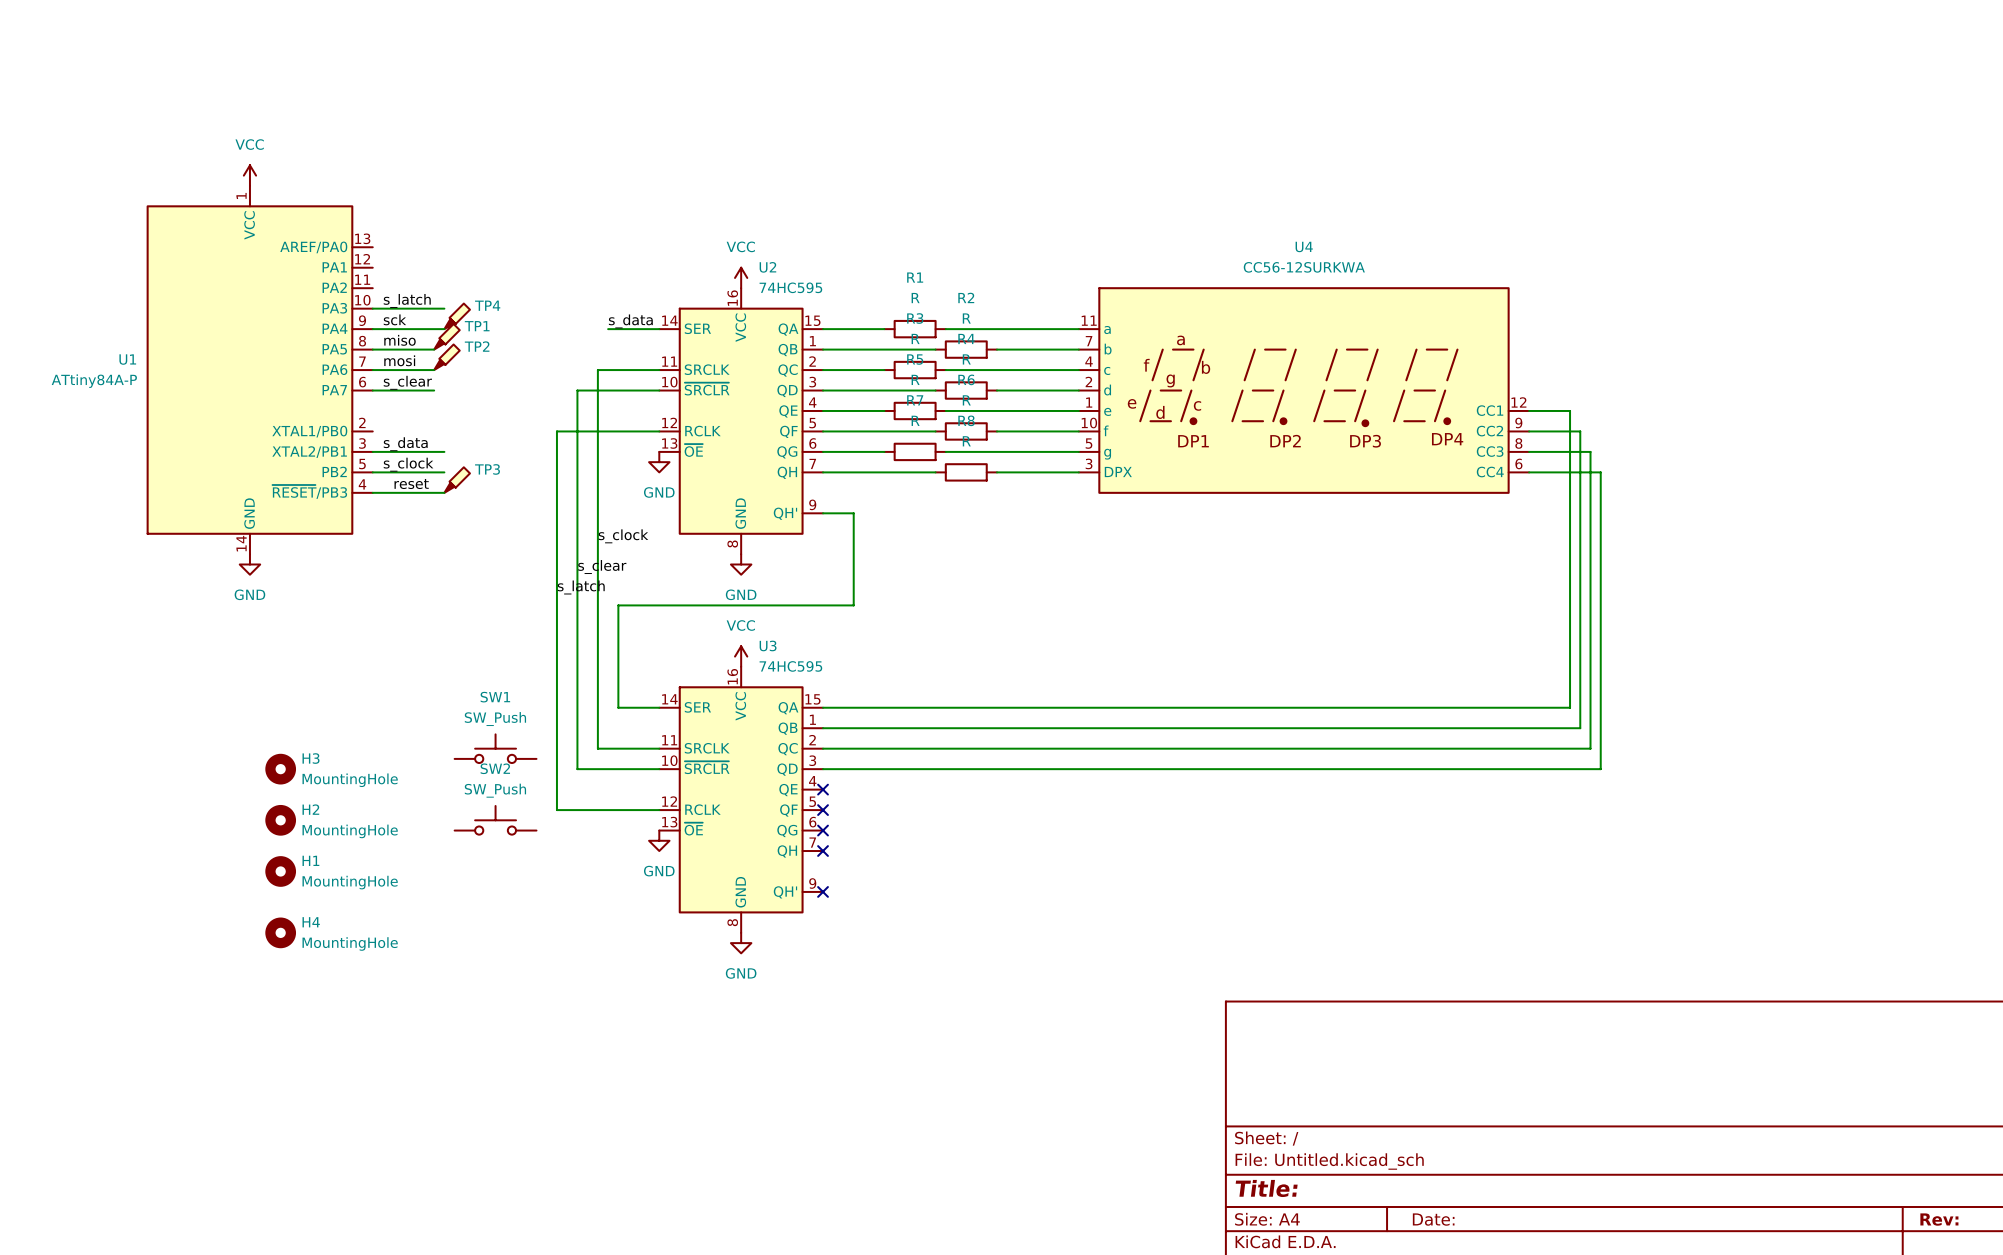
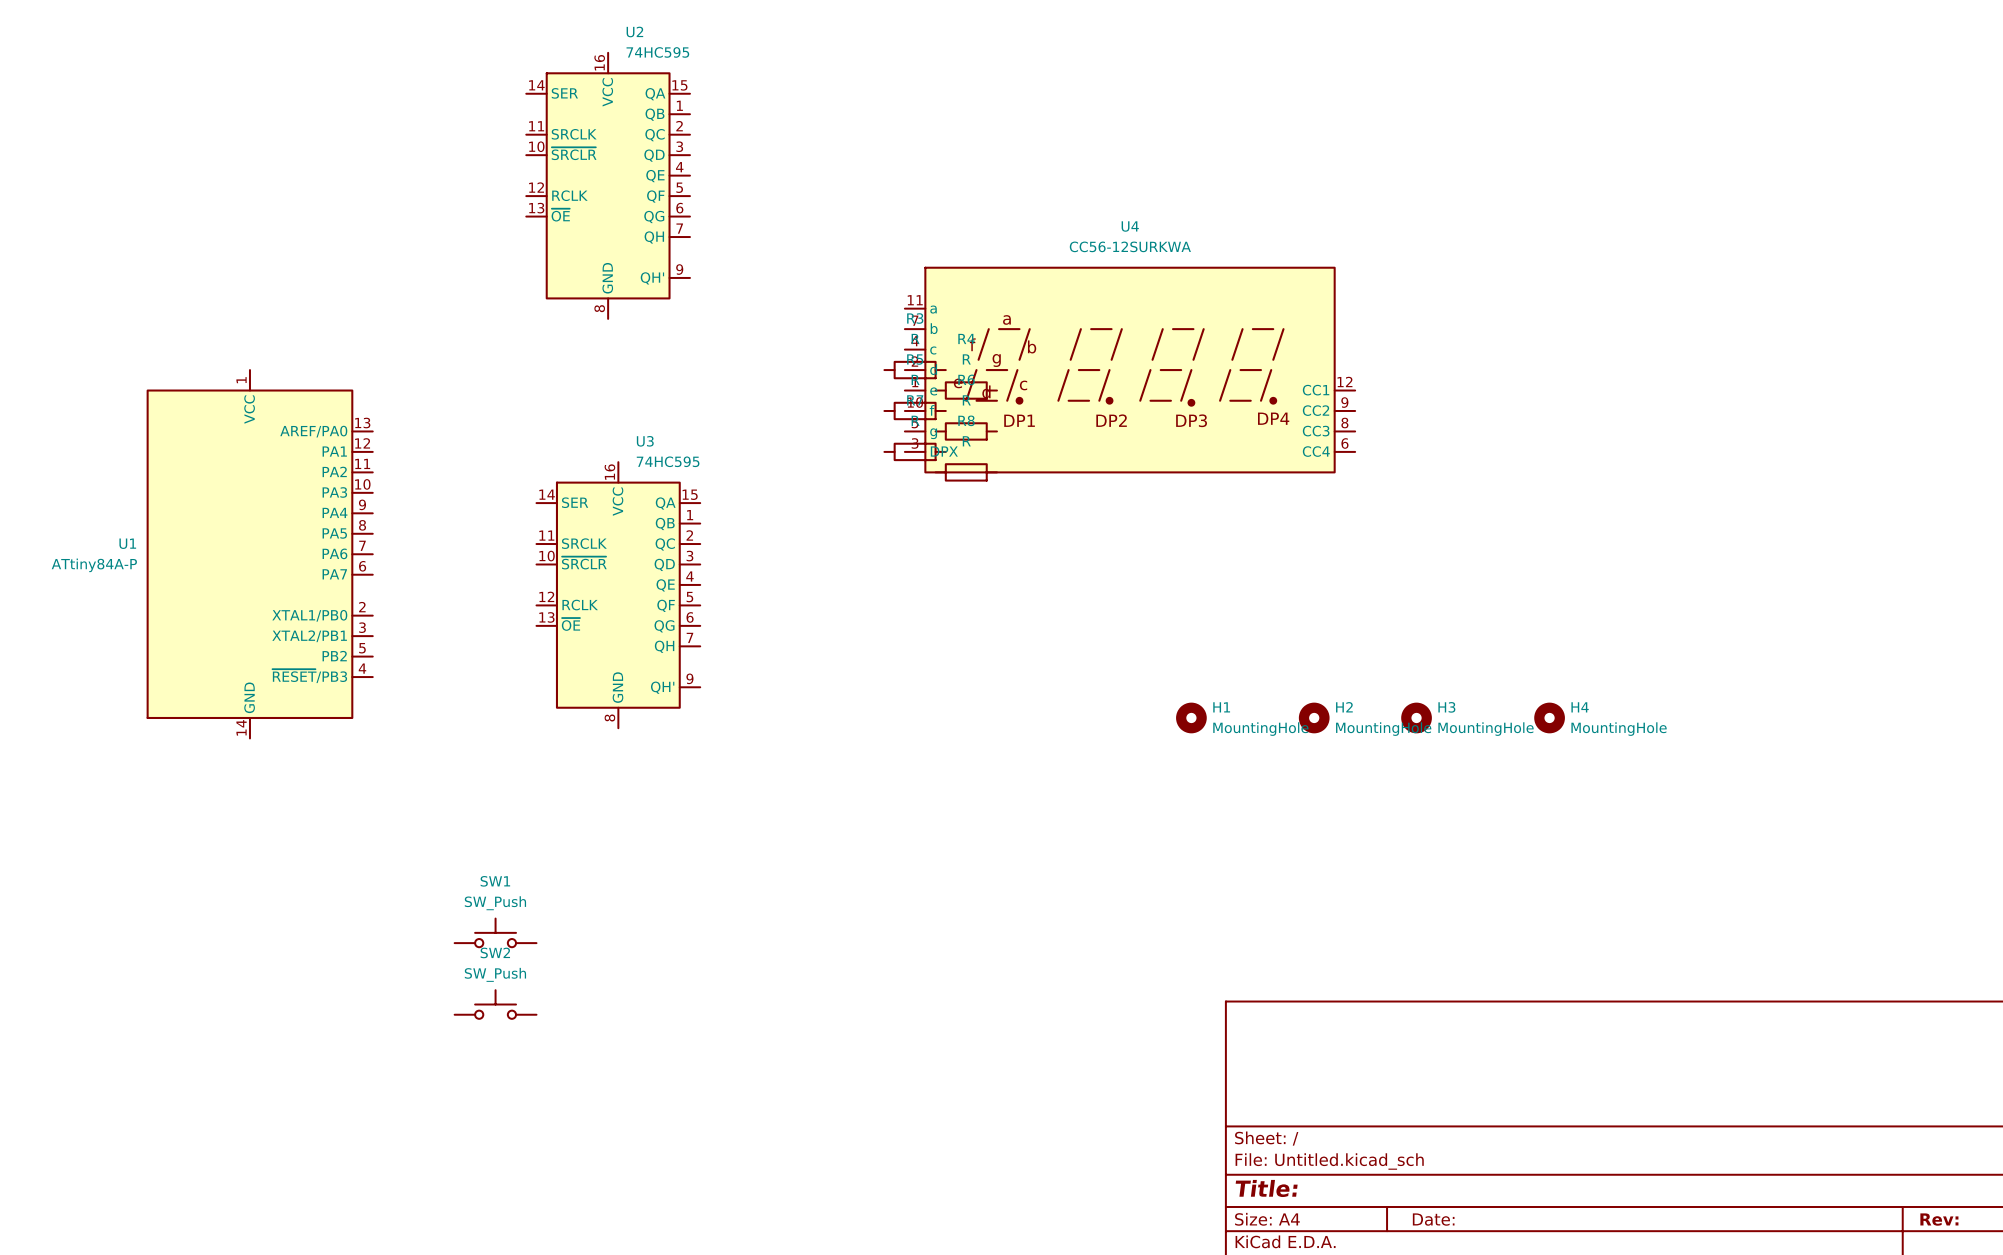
power symbol: VCC (249, 175) -> none
power symbol: VCC (741, 277) -> none
label: s_latch (407, 300) -> none
wire: (372, 308) (444, 308) -> none
TP4: (457, 316) -> none
label: sck (394, 319) -> none
label: s_data (630, 321) -> none
wire: (372, 329) (444, 329) -> none
wire: (608, 329) (659, 329) -> none
wire: (823, 329) (884, 329) -> none
R1: R (915, 329) -> none
TP1: (446, 336) -> none
label: miso (399, 340) -> none
wire: (372, 349) (434, 349) -> none
wire: (823, 349) (935, 349) -> none
R2: R (966, 349) -> none
TP2: (446, 357) -> none
label: mosi (399, 360) -> none
U1 position: (259, 370) -> (259, 554)
wire: (372, 370) (434, 370) -> none
wire: (659, 370) (597, 370) (597, 748) (659, 748) -> none
wire: (823, 370) (884, 370) -> none
label: s_clear (407, 382) -> none
wire: (372, 390) (434, 390) -> none
wire: (659, 390) (577, 390) (577, 769) (659, 769) -> none
wire: (823, 390) (935, 390) -> none
U4 position: (1303, 390) -> (1130, 370)
wire: (823, 410) (884, 410) -> none
wire: (1529, 410) (1570, 410) (1570, 707) (823, 707) -> none
U2 position: (741, 421) -> (608, 185)
wire: (659, 431) (556, 431) (556, 810) (659, 810) -> none
wire: (823, 431) (935, 431) -> none
wire: (1529, 431) (1580, 431) (1580, 728) (823, 728) -> none
label: s_data (405, 444) -> none
wire: (372, 451) (444, 451) -> none
wire: (823, 451) (884, 451) -> none
wire: (1529, 451) (1590, 451) (1590, 748) (823, 748) -> none
power symbol: GND (659, 462) -> none
label: s_clock (408, 464) -> none
wire: (372, 472) (444, 472) -> none
wire: (823, 472) (935, 472) -> none
wire: (1529, 472) (1600, 472) (1600, 769) (823, 769) -> none
TP3: (457, 480) -> none
label: reset (411, 484) -> none
wire: (372, 492) (444, 492) -> none
wire: (823, 513) (853, 513) (853, 605) (618, 605) (618, 707) (659, 707) -> none
label: s_clock (623, 536) -> none
power symbol: GND (249, 564) -> none
power symbol: GND (741, 564) -> none
label: s_clear (602, 567) -> none
label: s_latch (581, 587) -> none
power symbol: VCC (741, 656) -> none
SW1 position: (495, 748) -> (495, 932)
H3 position: (280, 769) -> (1416, 717)
no-connect mark: (823, 789) -> none
U3 position: (741, 799) -> (618, 595)
no-connect mark: (823, 810) -> none
H2 position: (280, 820) -> (1314, 717)
SW2 position: (495, 820) -> (495, 1004)
no-connect mark: (823, 830) -> none
power symbol: GND (659, 840) -> none
no-connect mark: (823, 851) -> none
H1 position: (280, 871) -> (1191, 717)
no-connect mark: (823, 891) -> none
H4 position: (280, 932) -> (1549, 717)
power symbol: GND (741, 943) -> none

